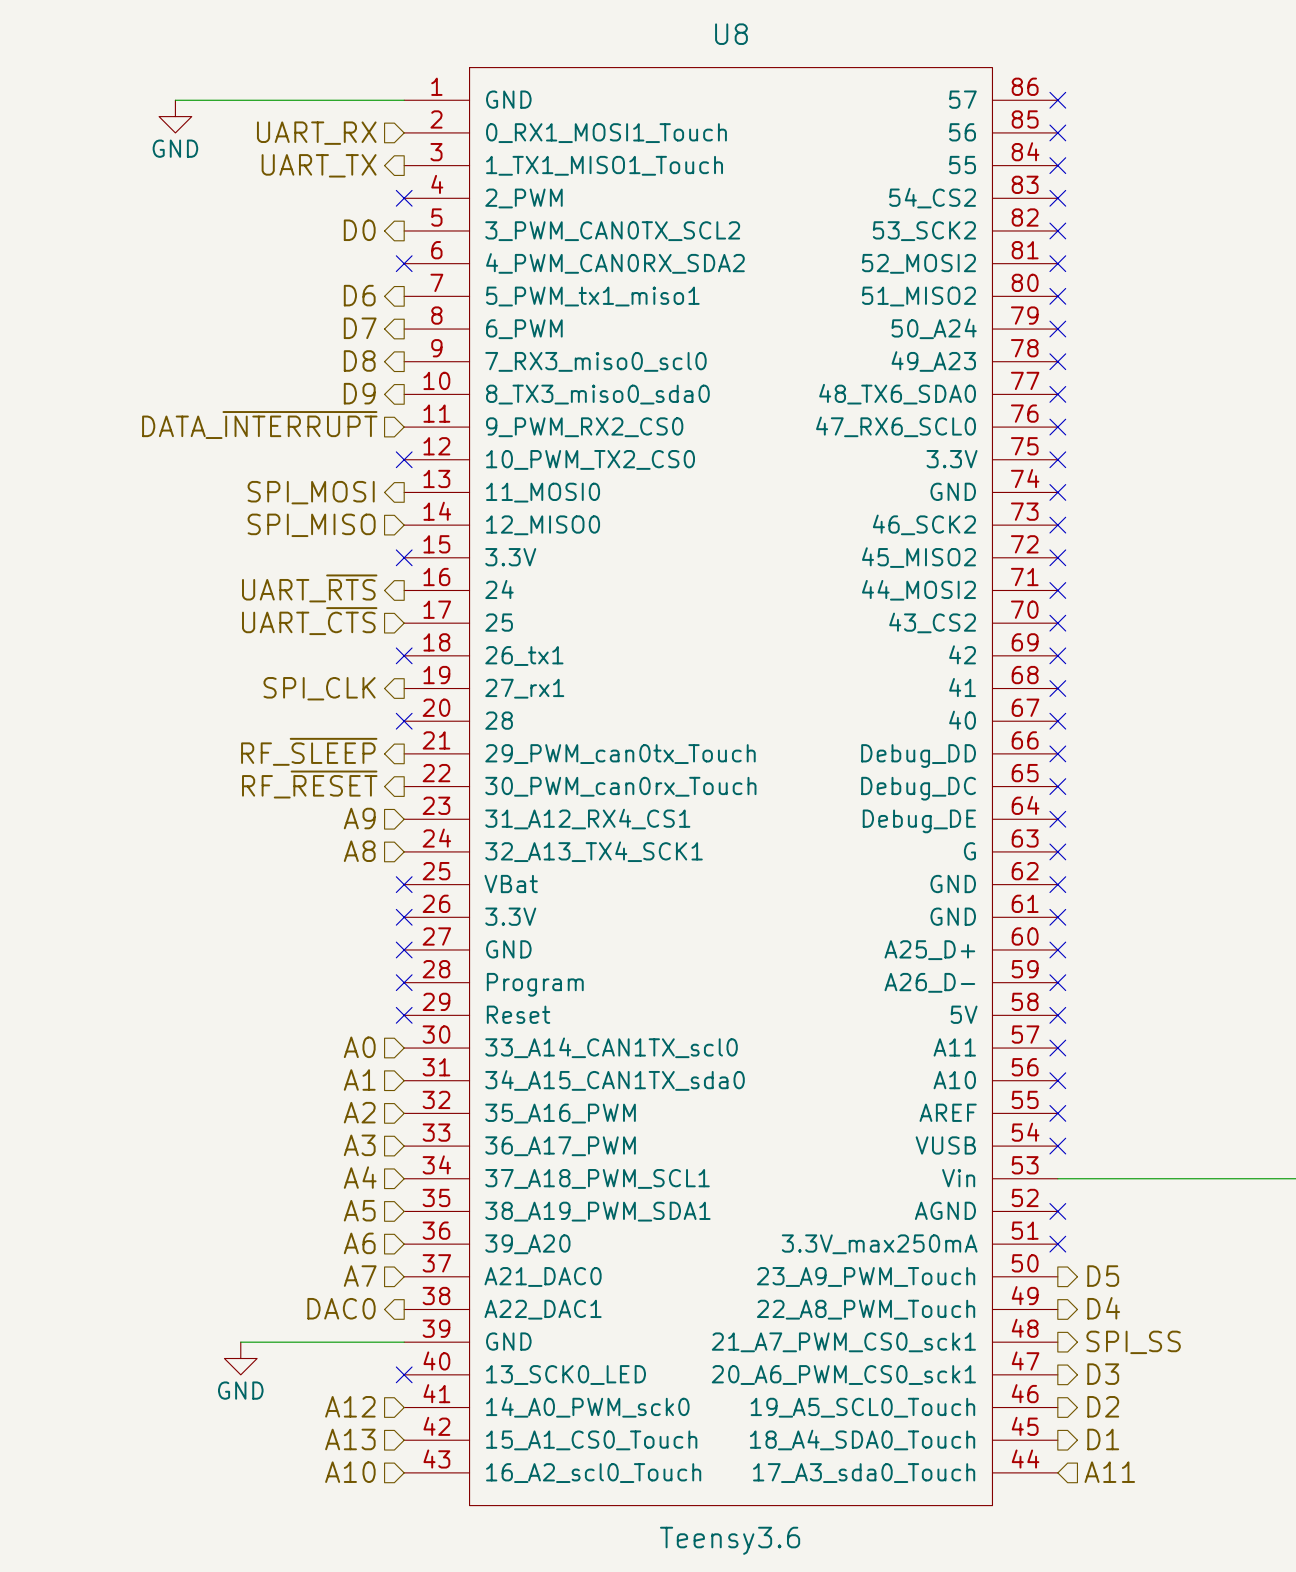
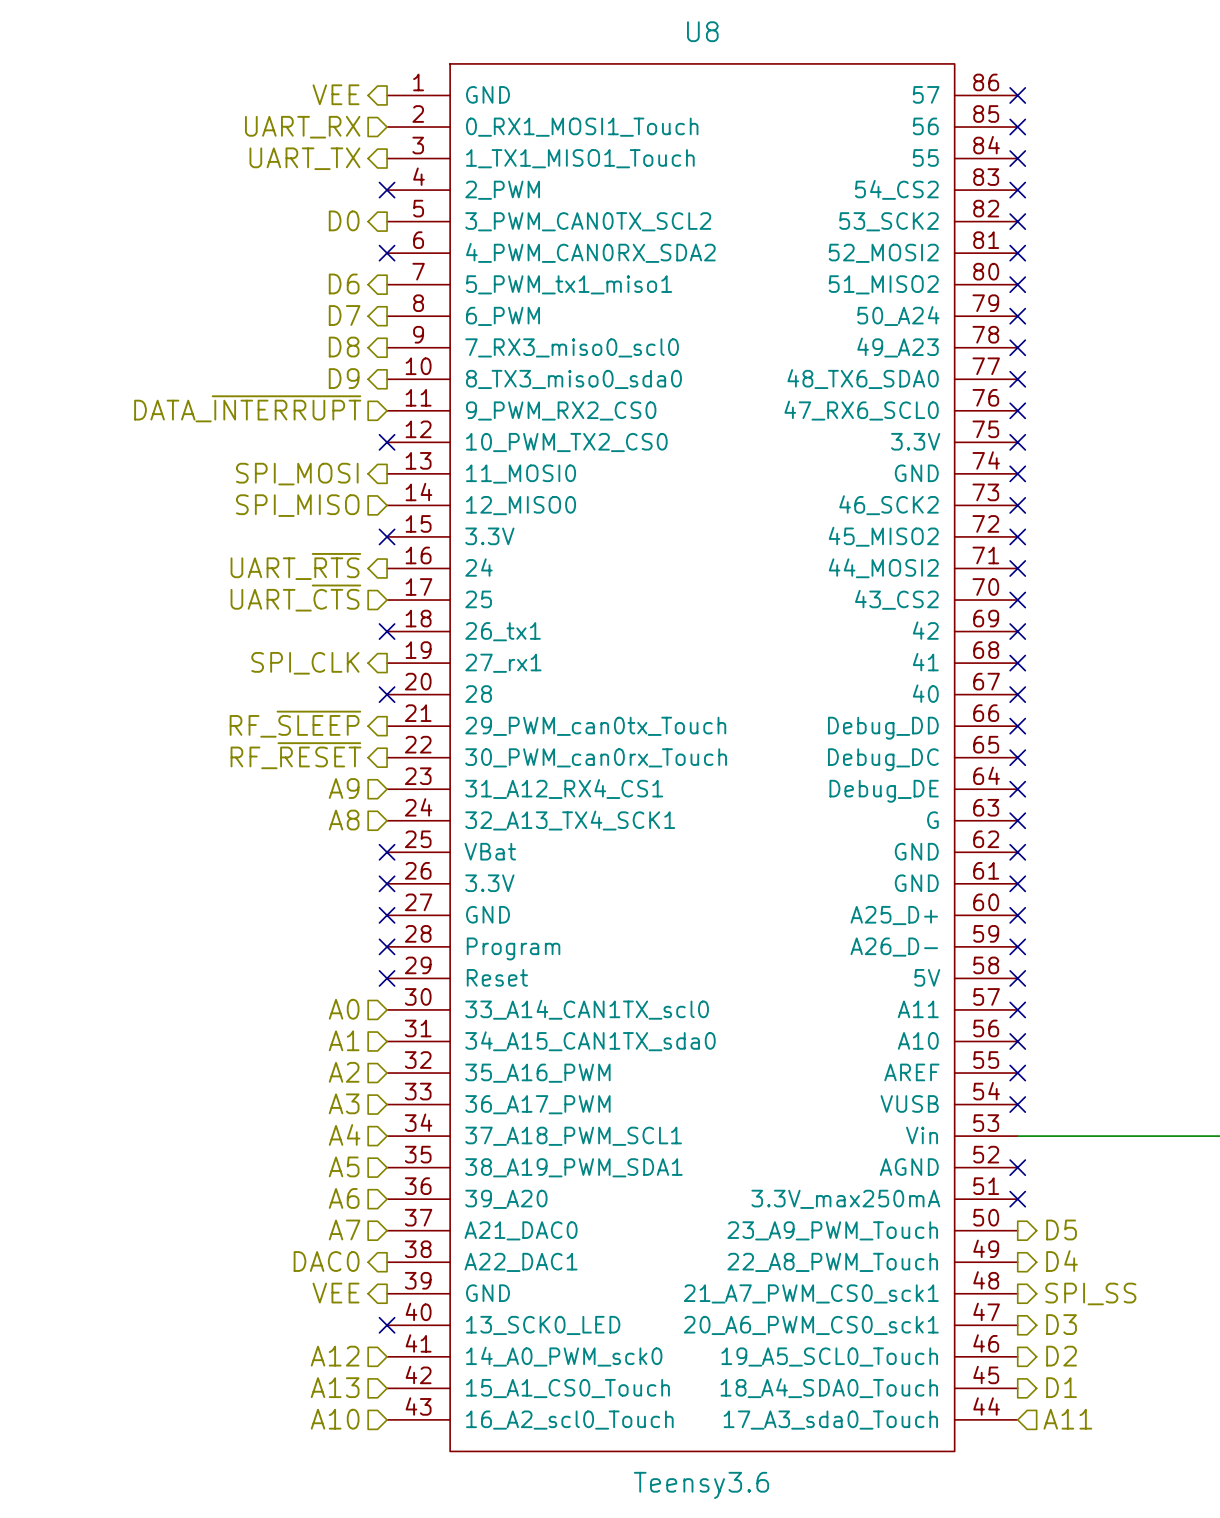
hierarchical label: none -> VEE (336, 94)
wire: (175, 100) (404, 100) -> none
power symbol: GND (175, 116) -> none
hierarchical label: none -> VEE (336, 1293)
wire: (240, 1342) (404, 1342) -> none
power symbol: GND (240, 1358) -> none

